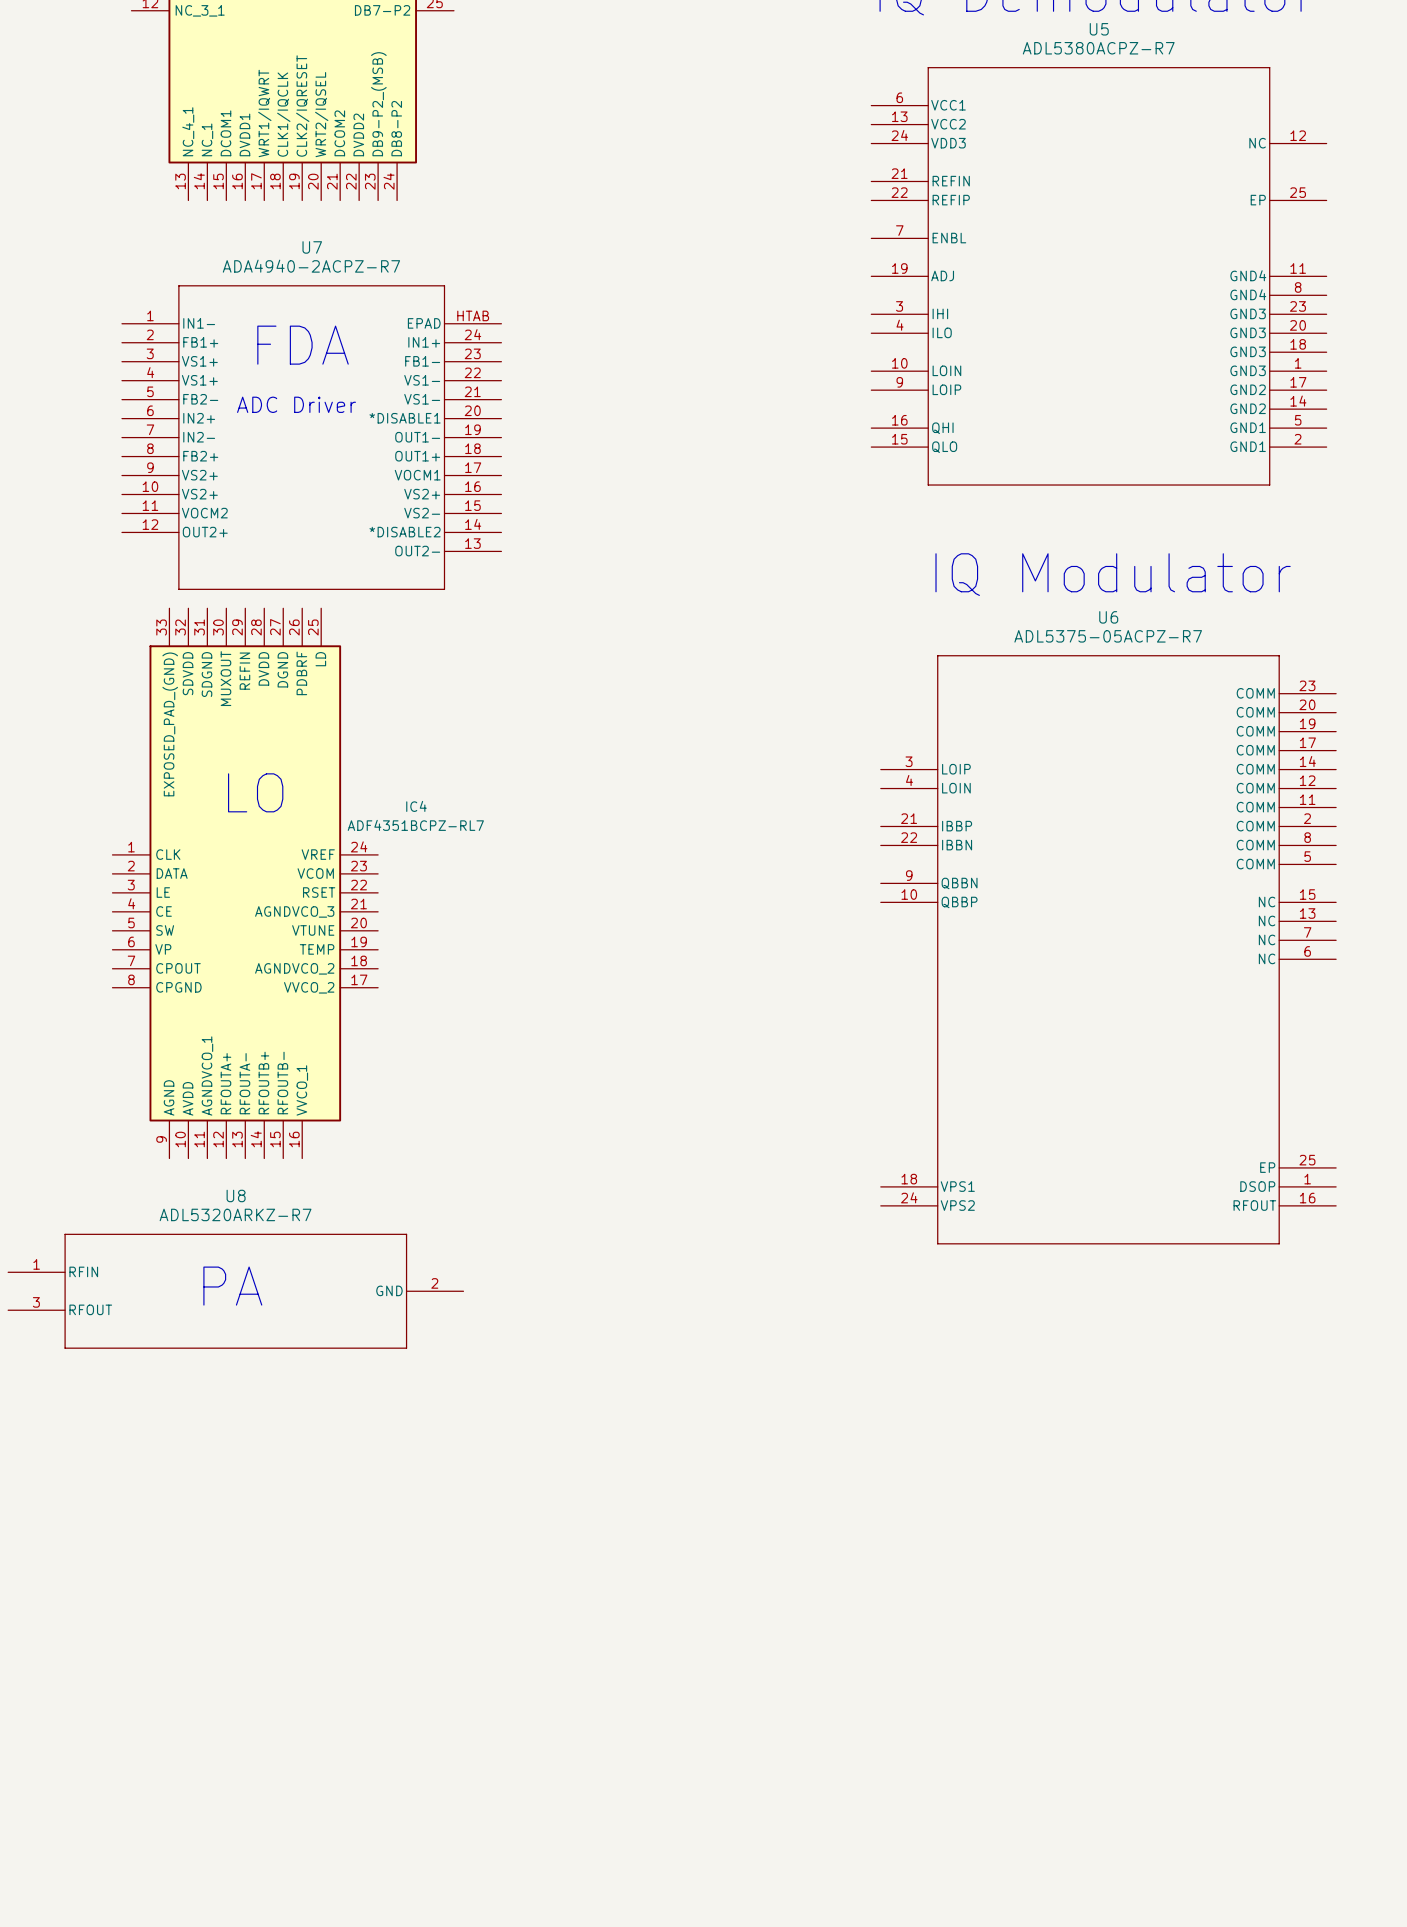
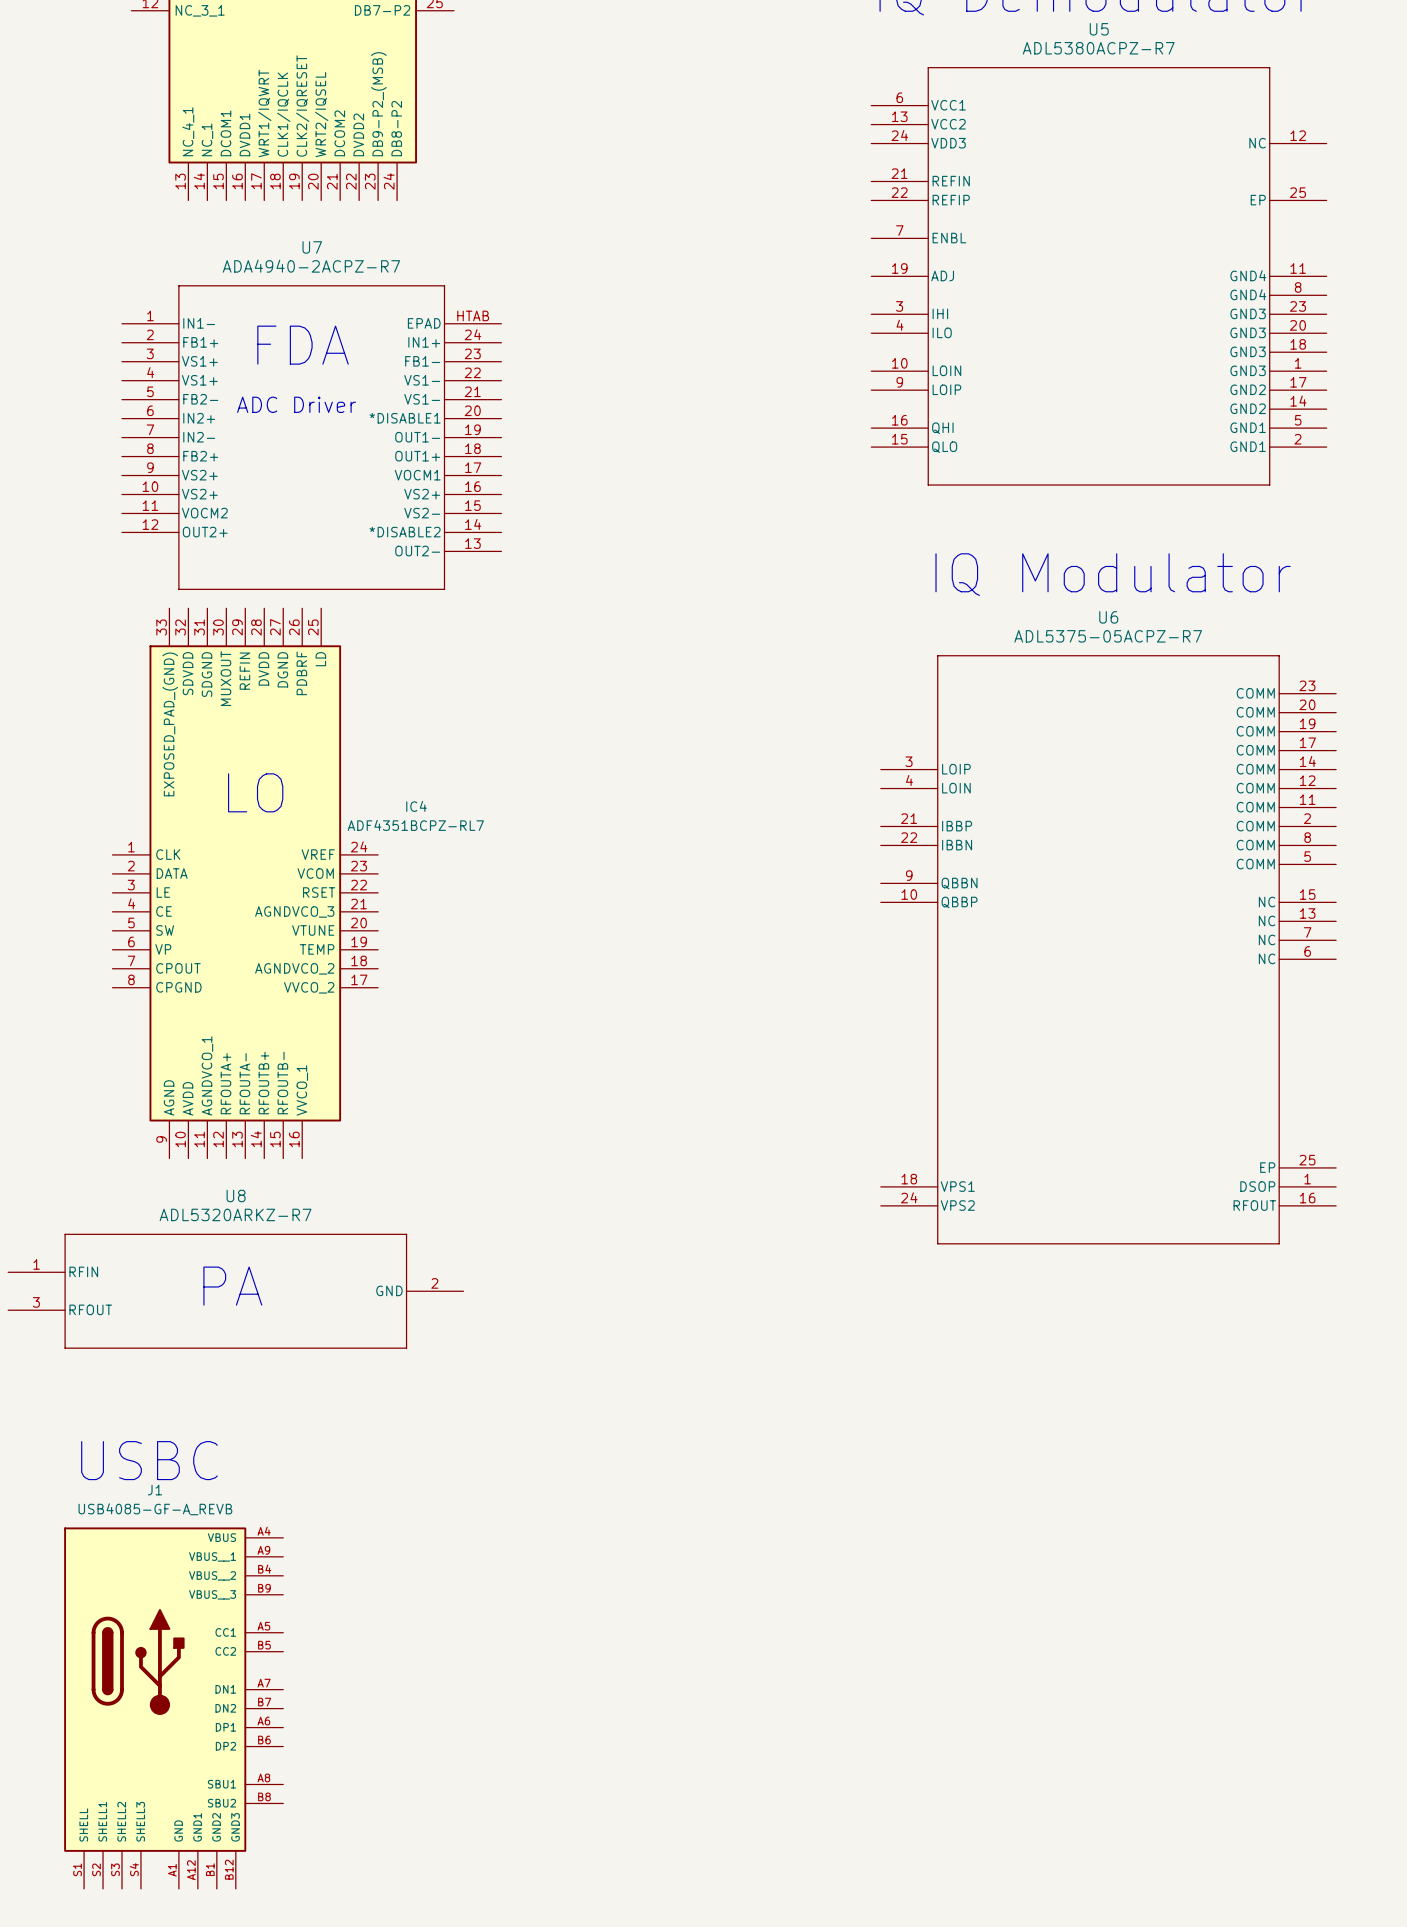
text: none -> USBC (149, 1460)
J1: none -> USB4085-GF-A_REVB (173, 1708)

